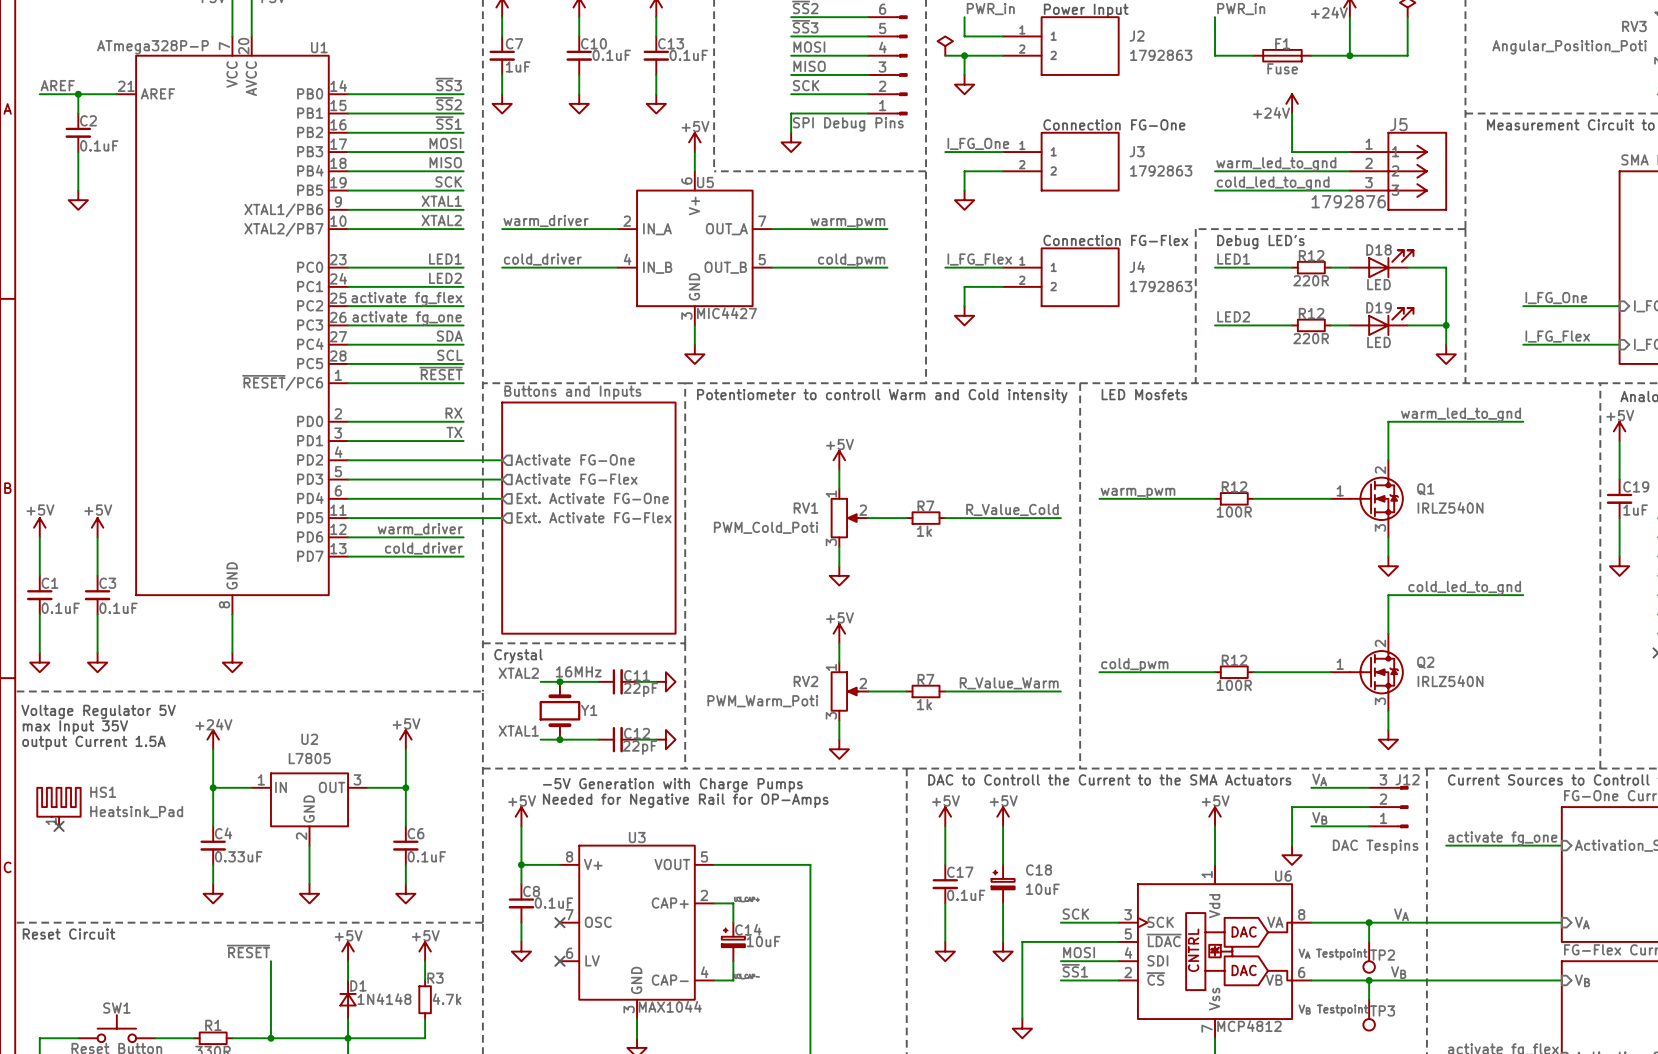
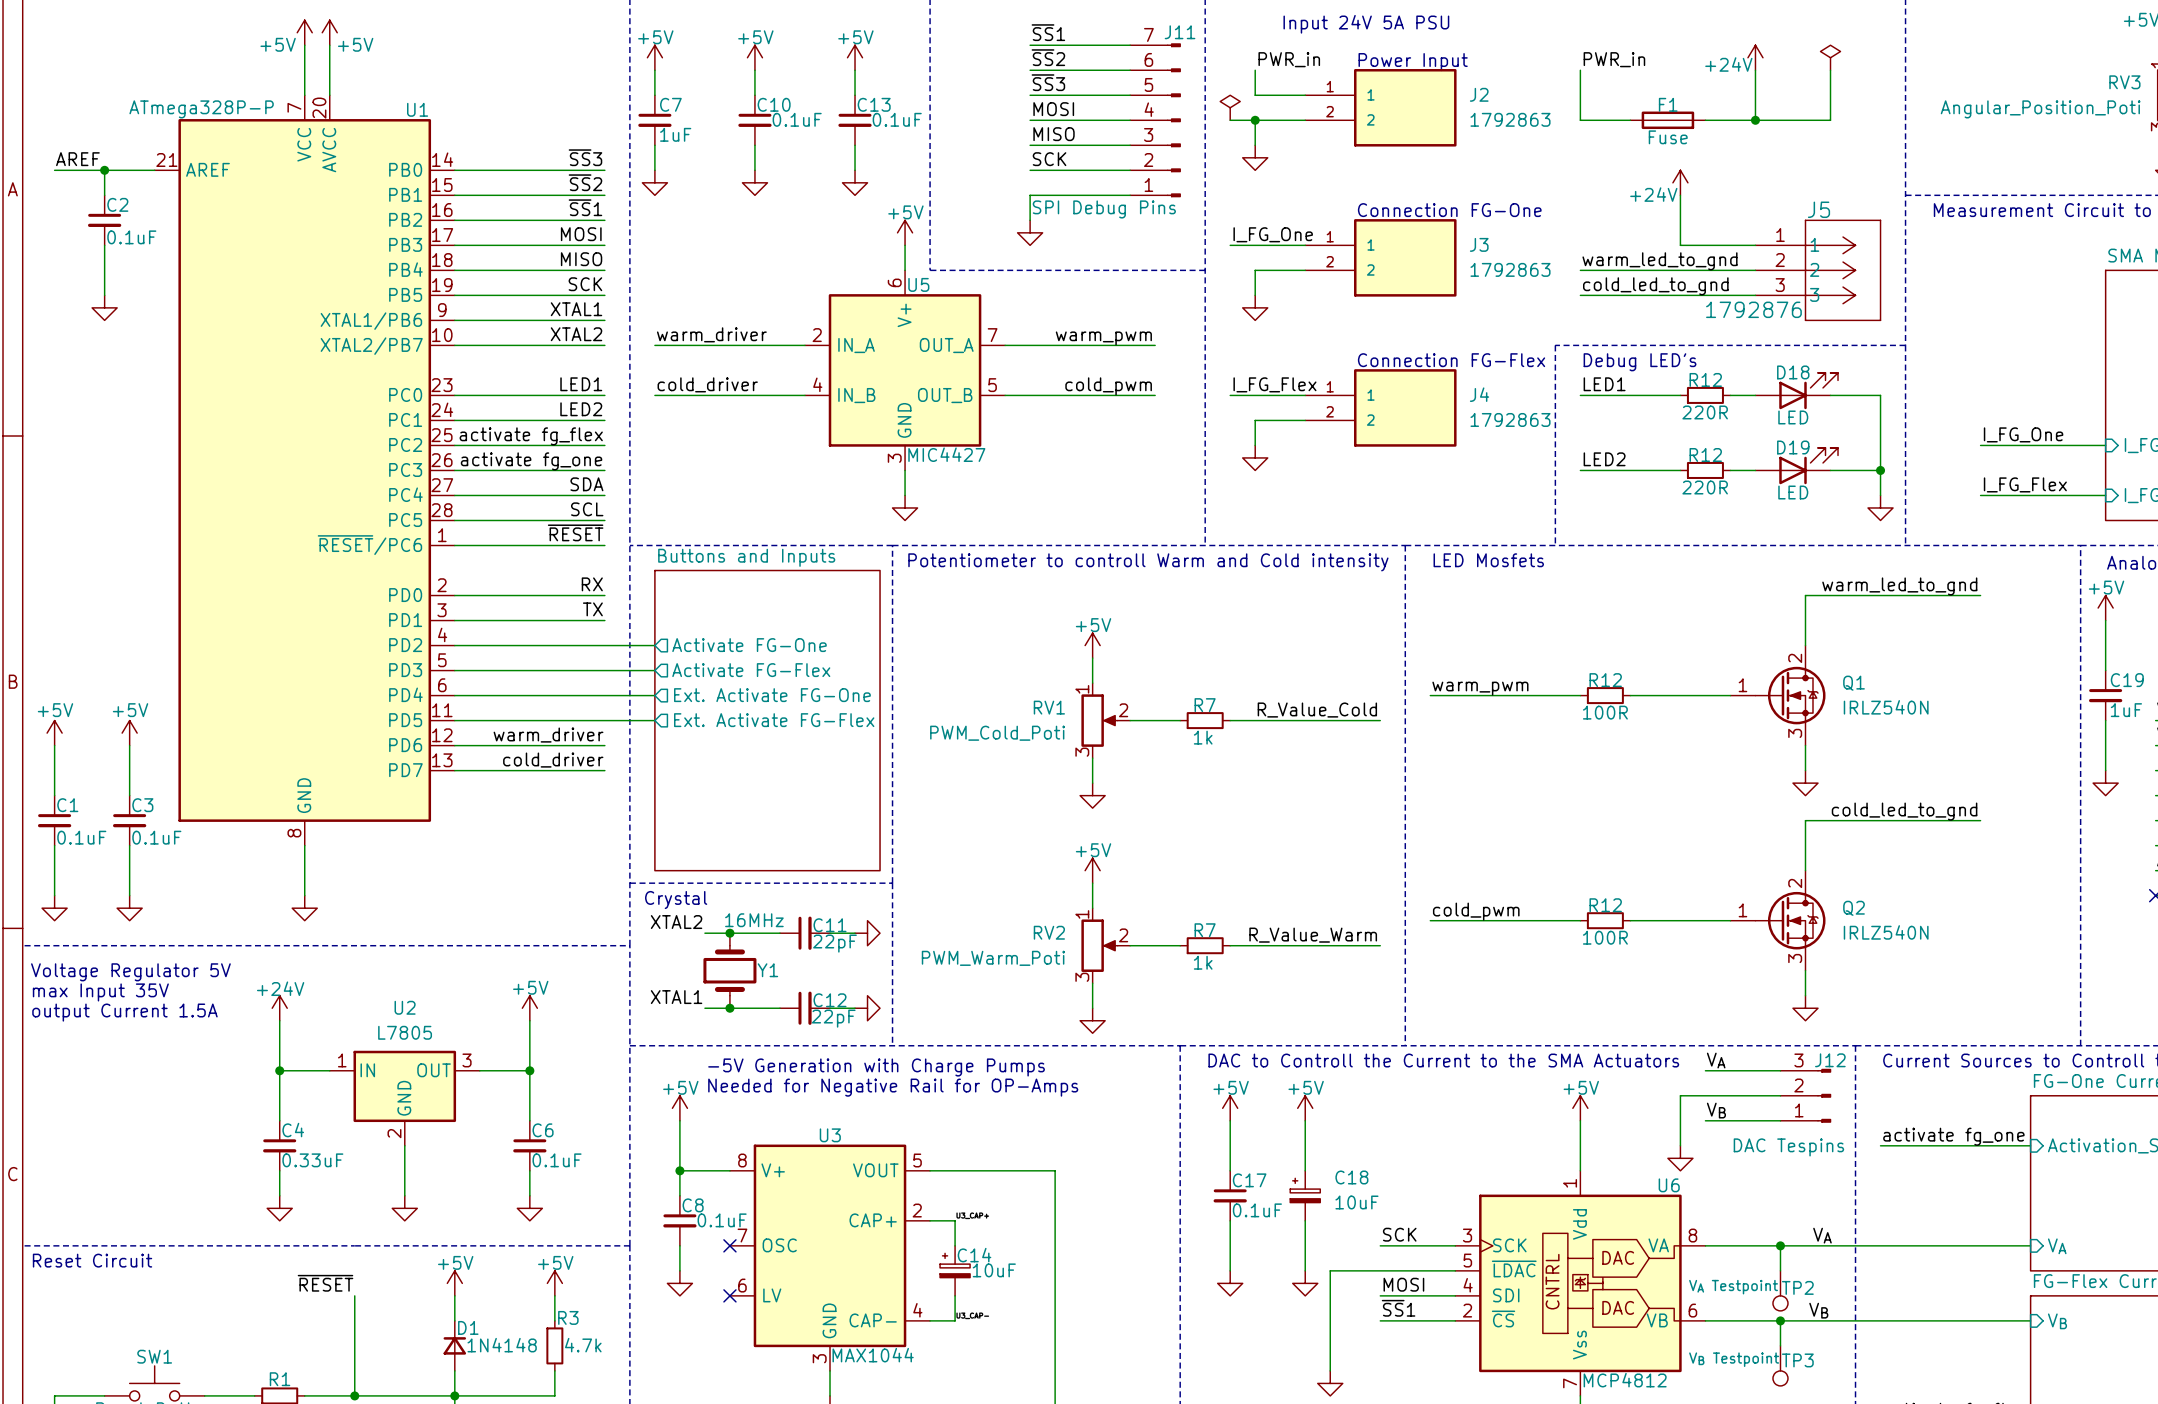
HS1: Heatsink_Pad (58, 806) -> none
no-connect mark: (59, 826) -> none

